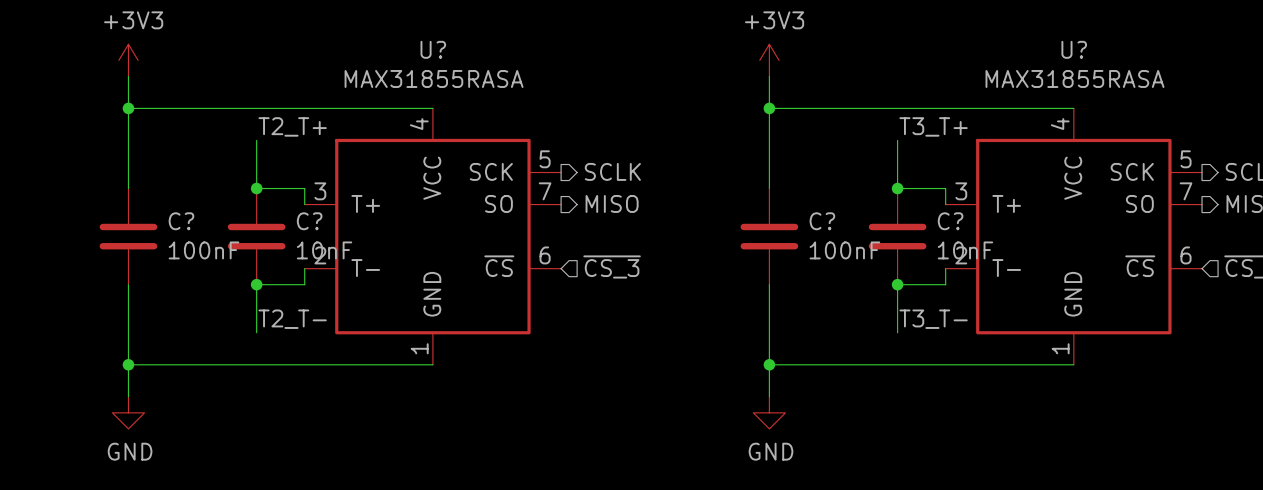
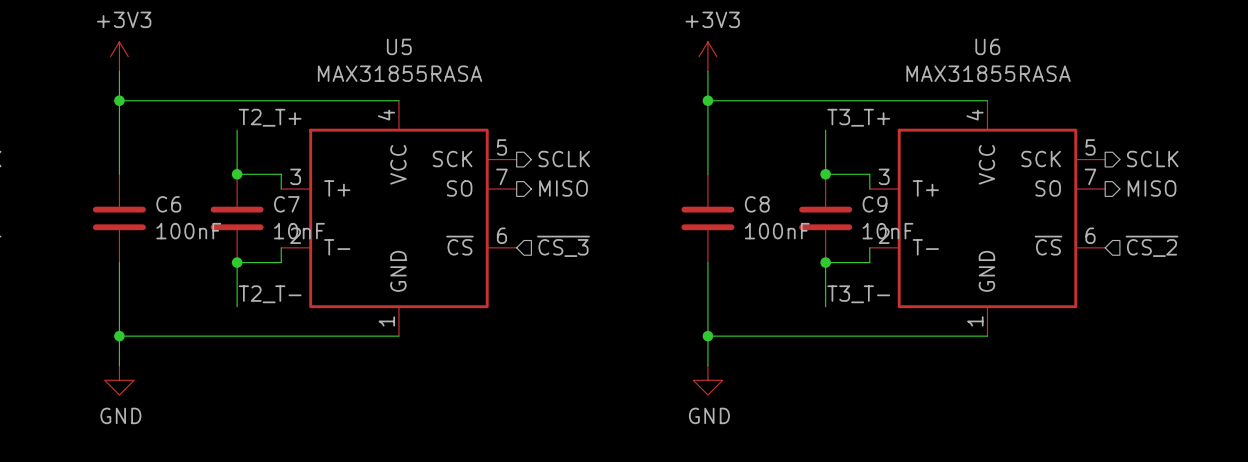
U? name: U? (433, 49) -> U5 (399, 46)
U? name: U? (1074, 49) -> U6 (987, 46)
C? name: C? (181, 221) -> C6 (168, 204)
C? name: C? (309, 221) -> C7 (286, 204)
C? name: C? (822, 221) -> C8 (757, 204)
C? name: C? (950, 221) -> C9 (875, 204)

